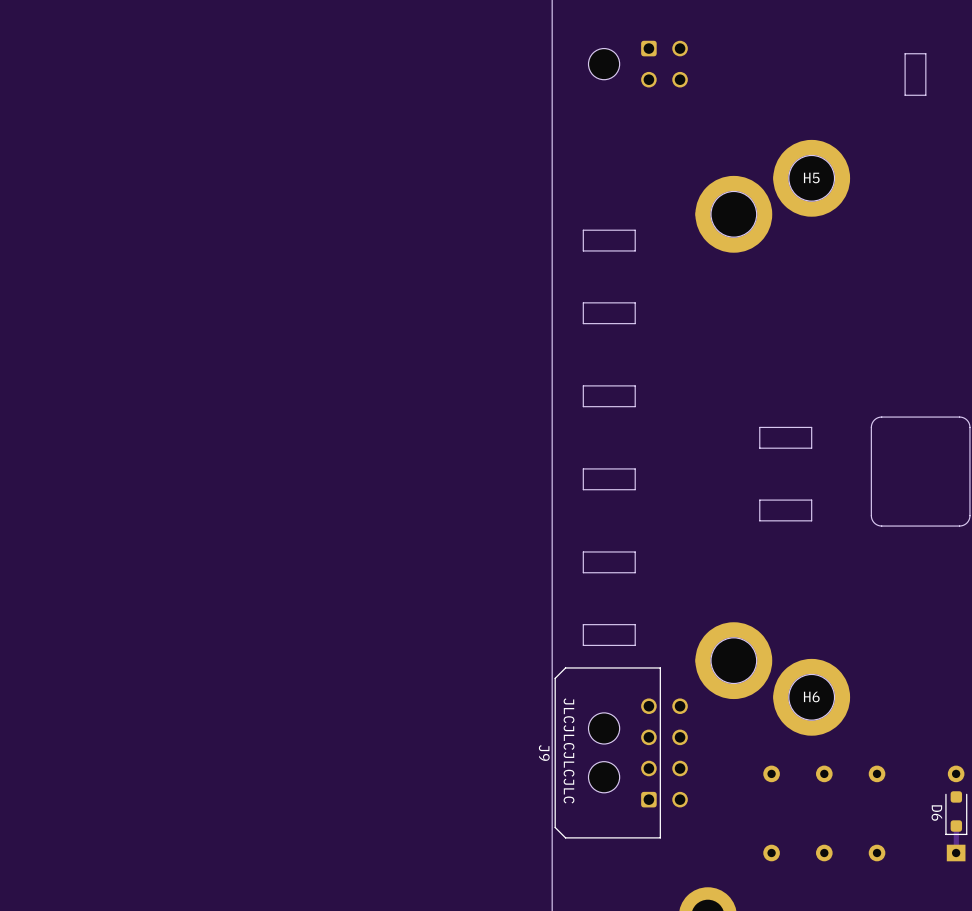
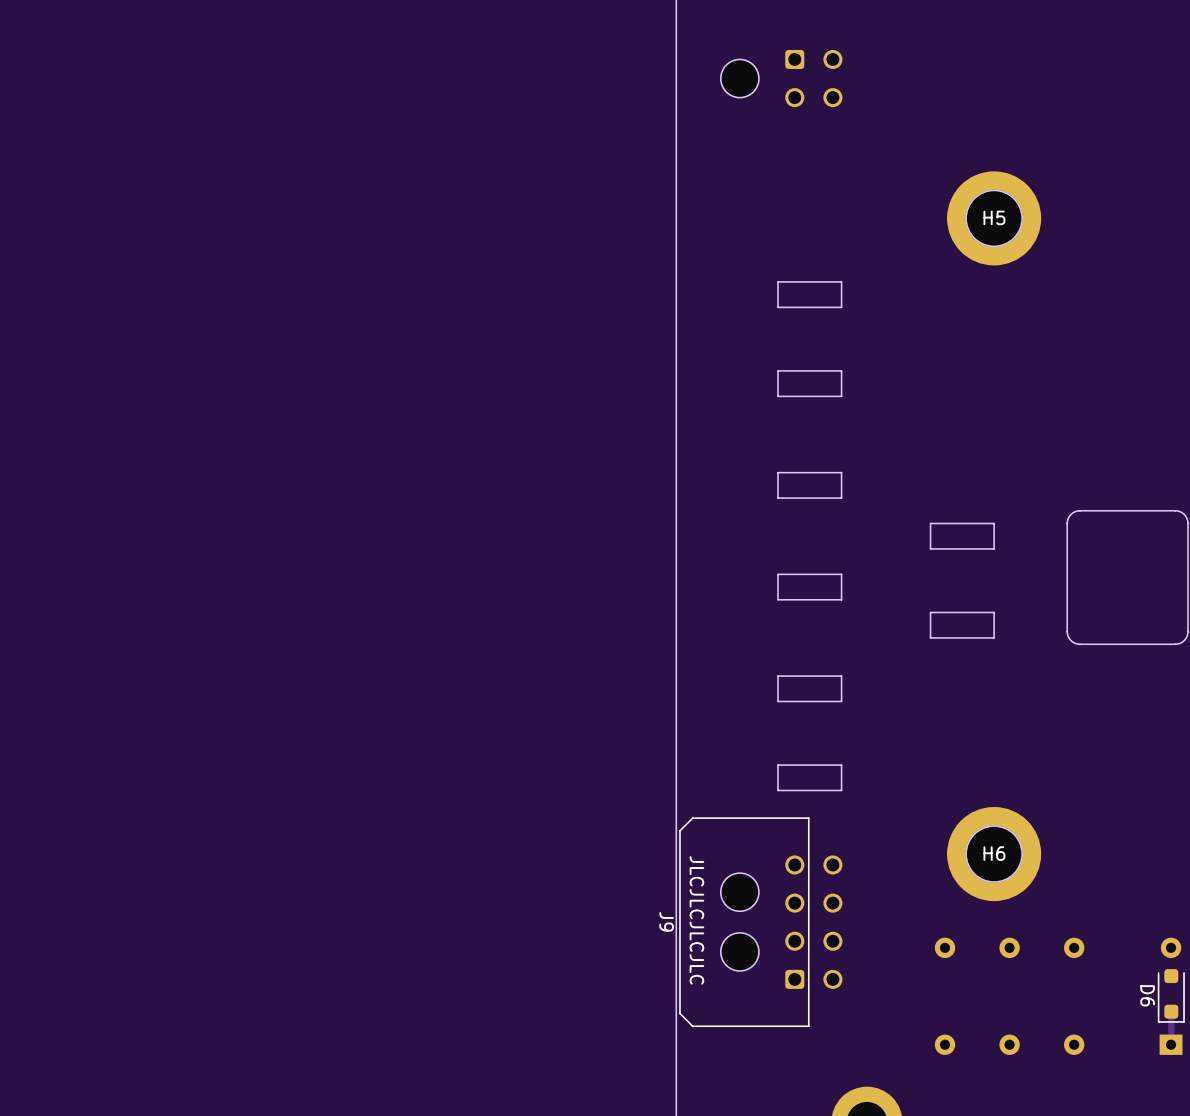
board edge: (925, 53) (905, 53) (905, 95) (925, 95) (925, 53) -> none
part: (733, 214) -> none
board edge: (635, 230) (583, 230) (583, 250) (635, 250) -> (778, 281) (841, 281) (841, 307) (778, 307)
board edge: (635, 302) (583, 302) (583, 323) (635, 323) -> (778, 370) (841, 370) (841, 396) (778, 396)
board edge: (635, 385) (583, 385) (583, 406) (635, 406) -> (778, 472) (841, 472) (841, 498) (778, 498)
board edge: (635, 468) (583, 468) (583, 489) (635, 489) -> (778, 574) (841, 574) (841, 599) (778, 599)
board edge: (635, 551) (583, 551) (583, 572) (635, 572) -> (778, 676) (841, 676) (841, 701) (778, 701)
board edge: (635, 624) (583, 624) (583, 645) (635, 645) -> (778, 765) (841, 765) (841, 790) (778, 790)
part: (733, 660) -> none

